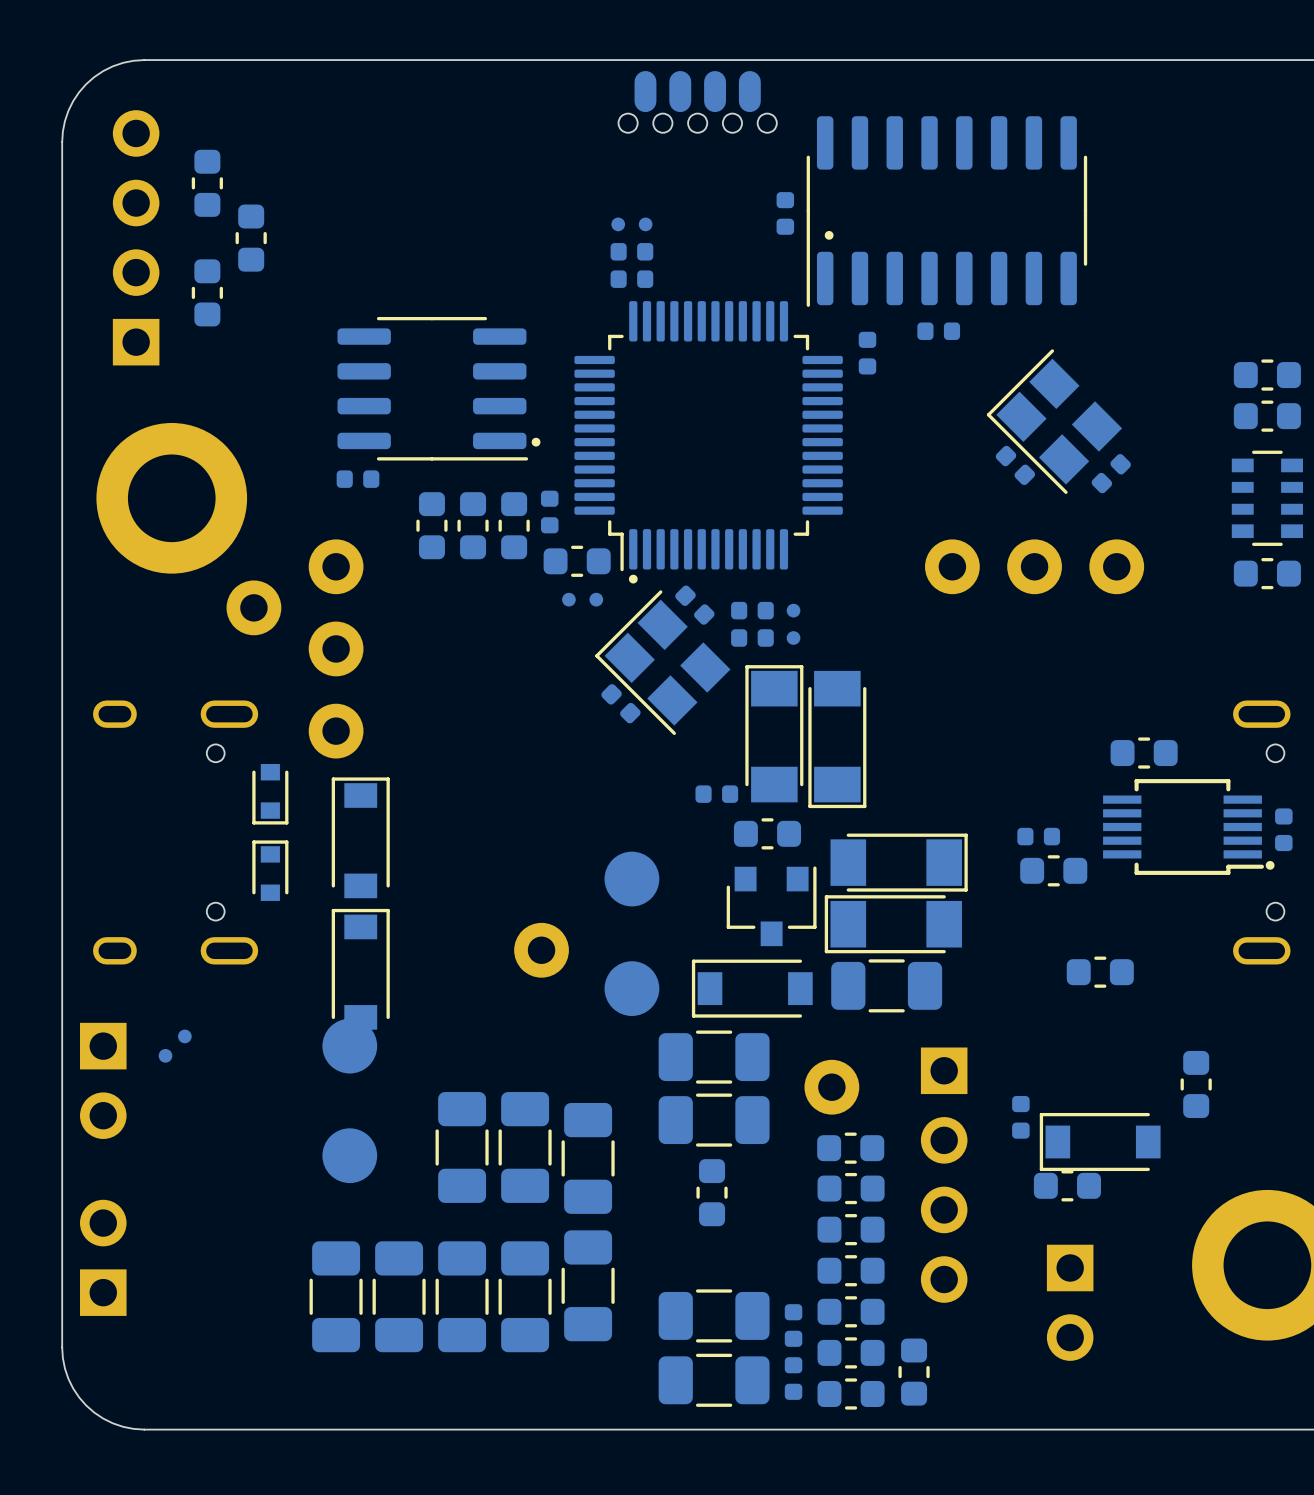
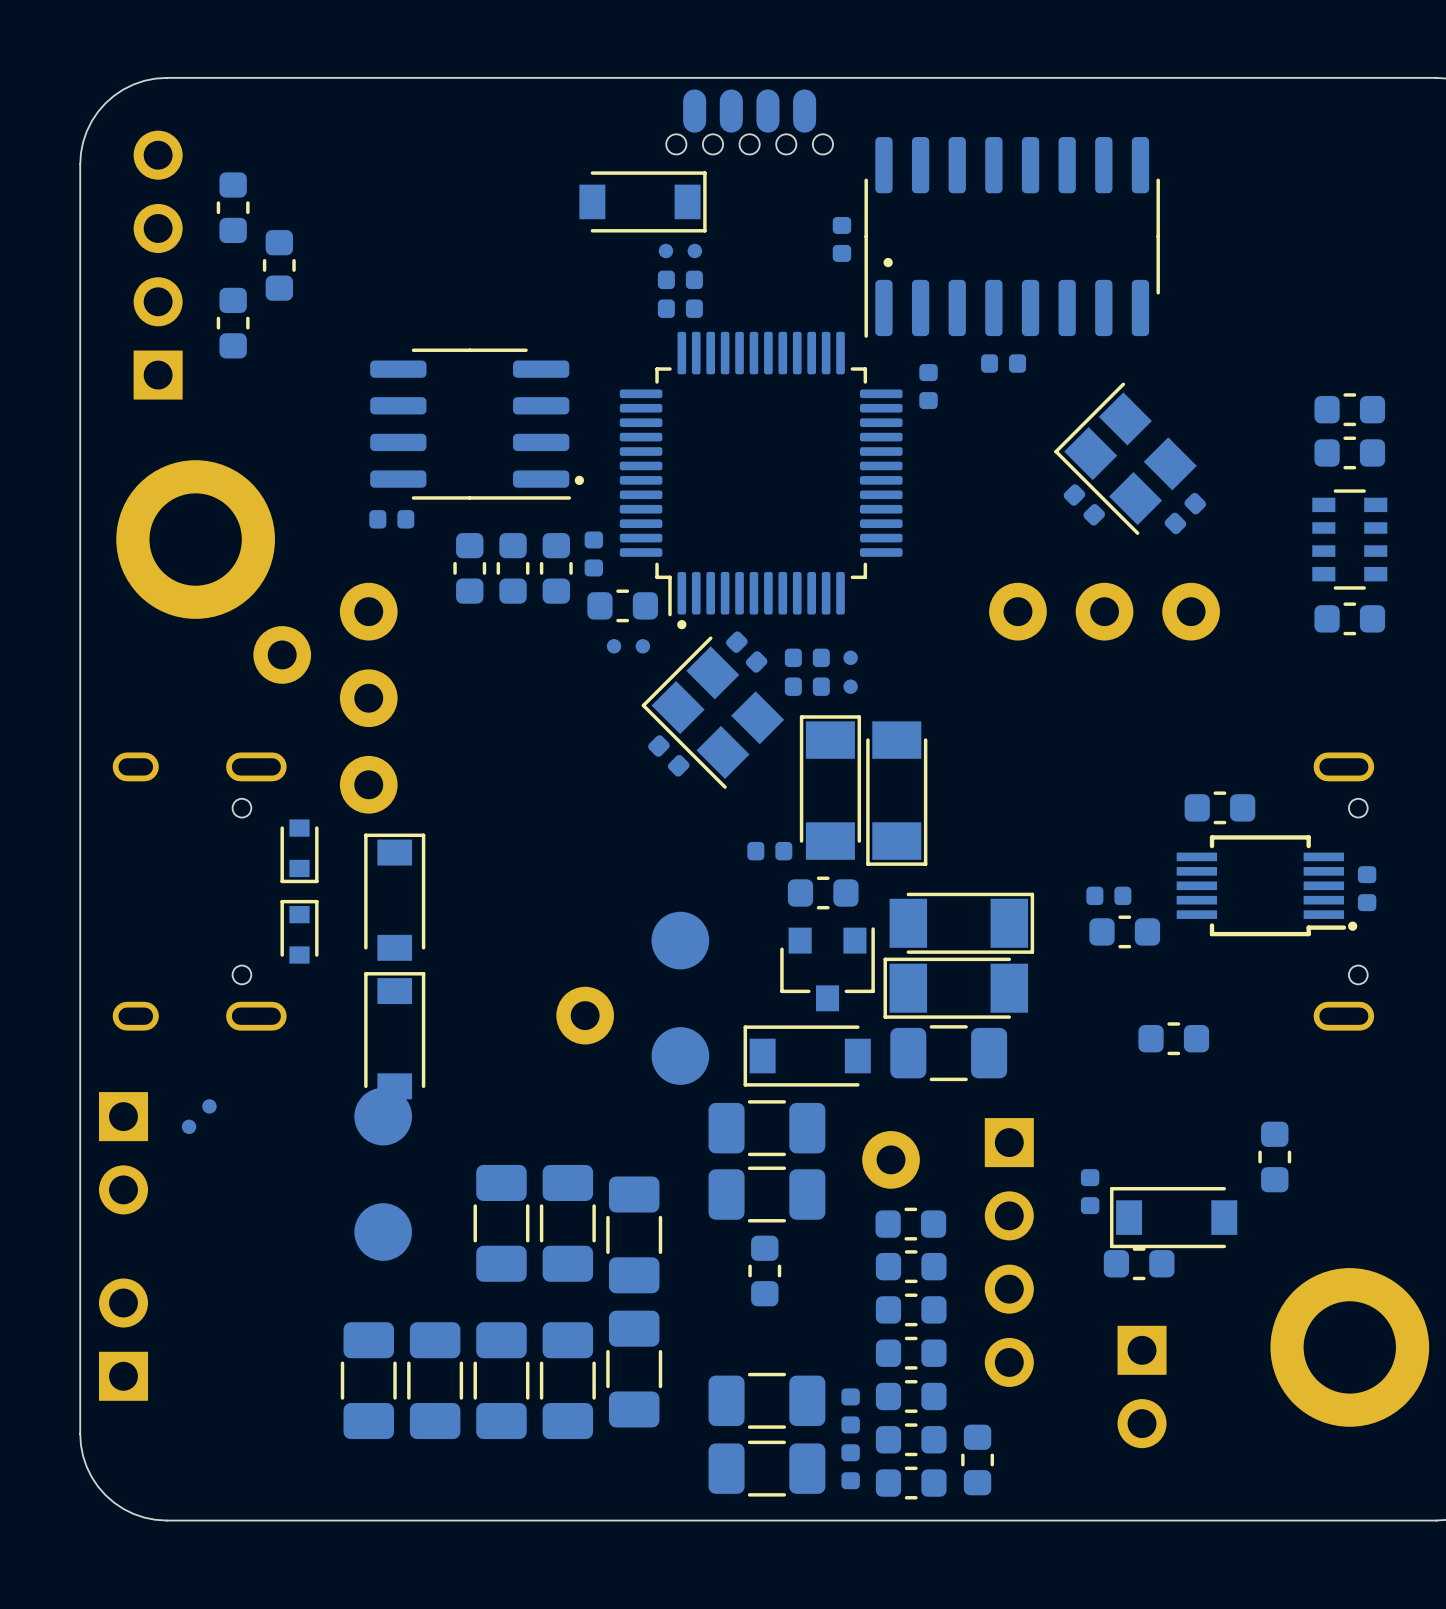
part: none -> (643, 201)

